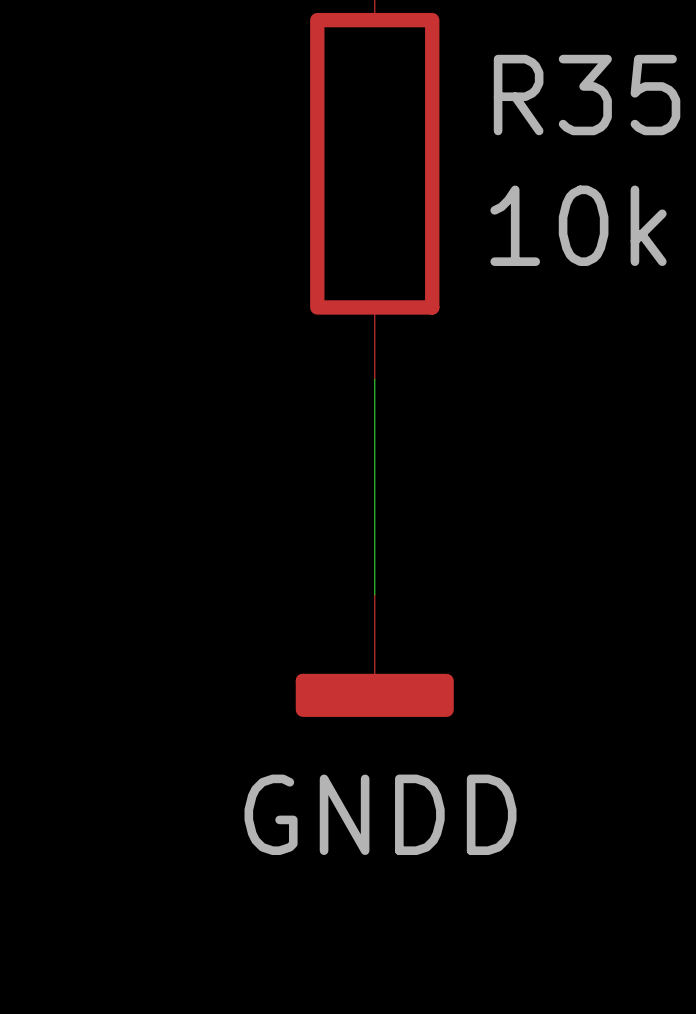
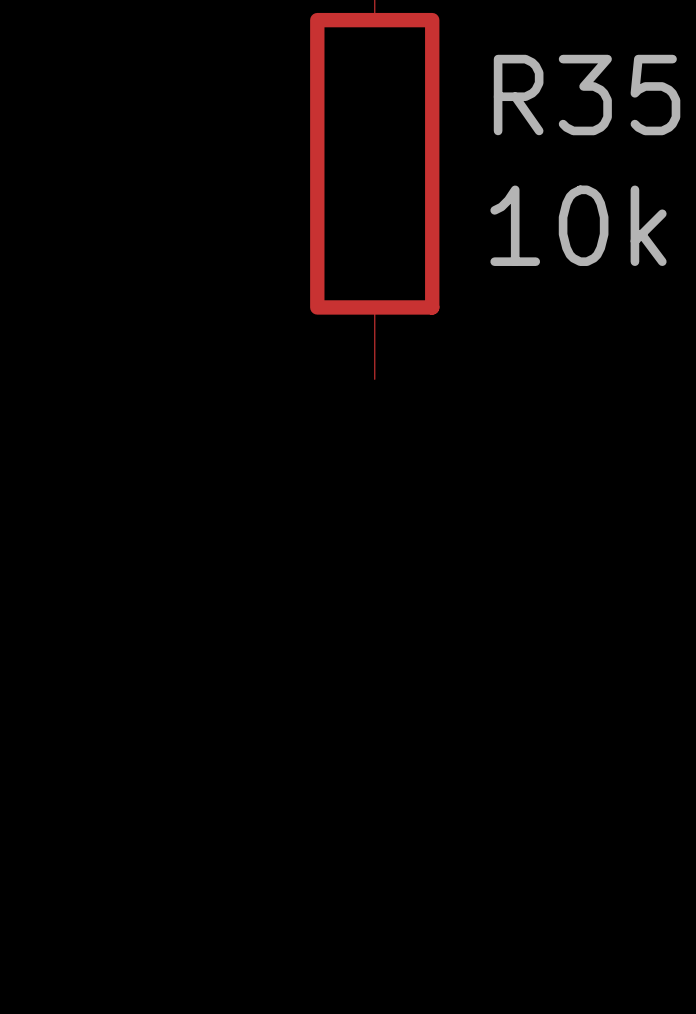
wire: (374, 379) (374, 594) -> none
power symbol: GNDD (374, 655) -> none

